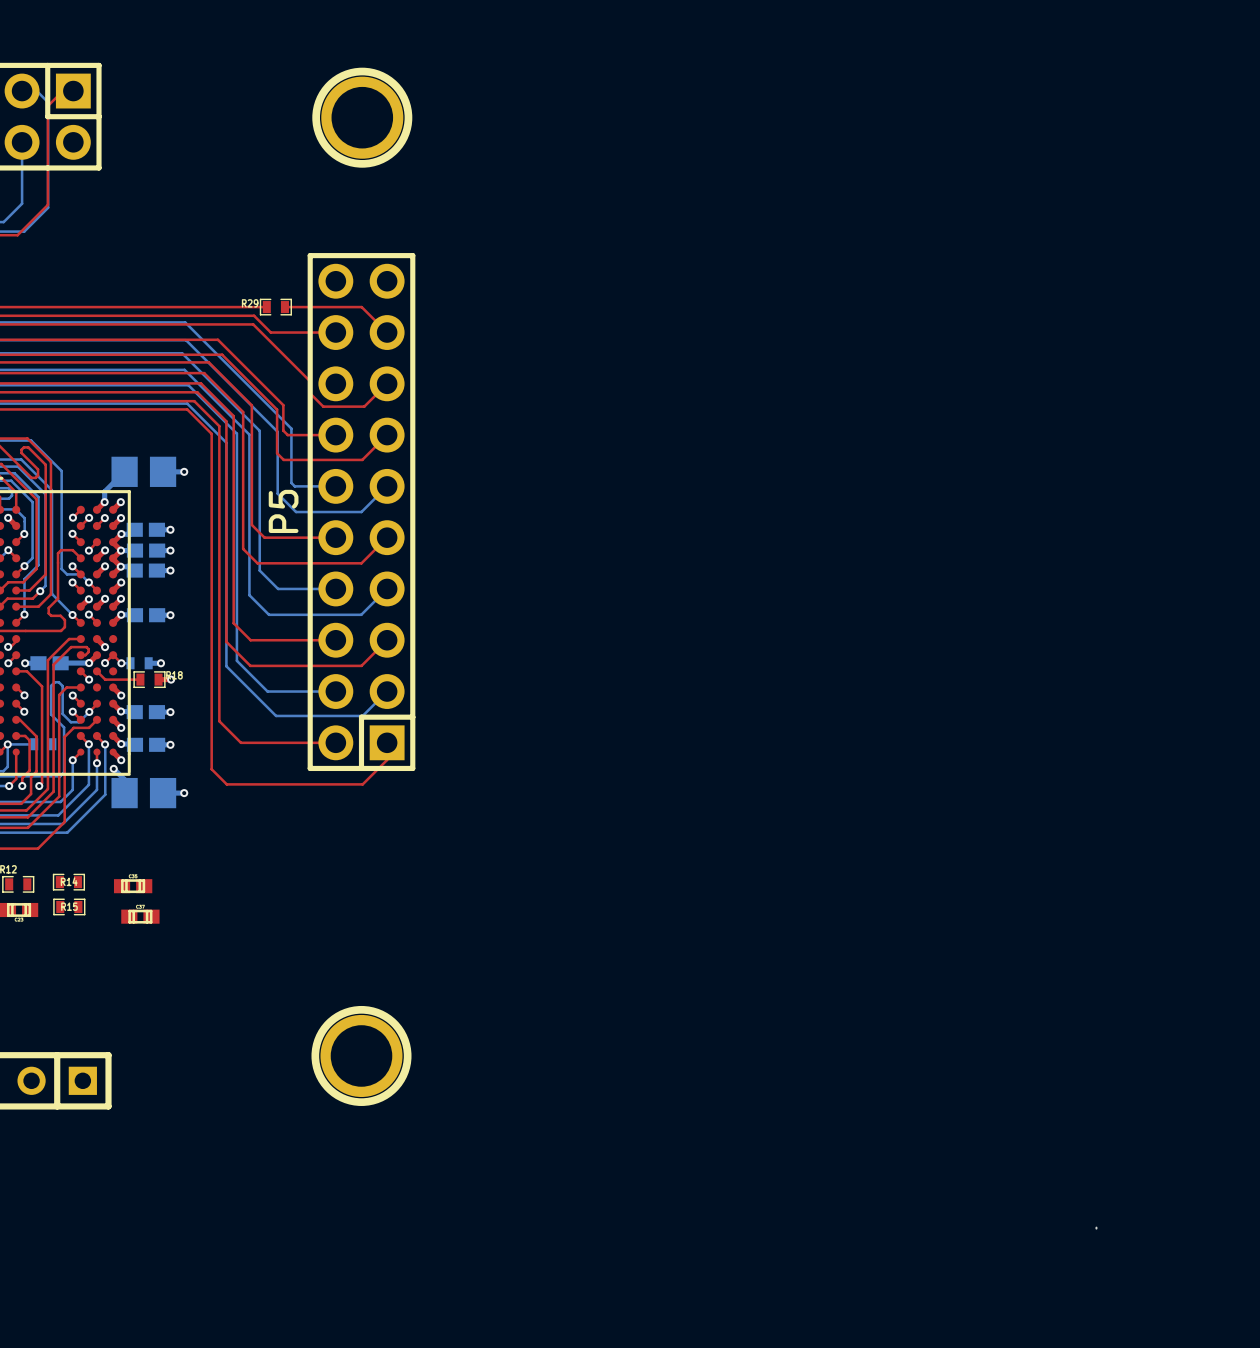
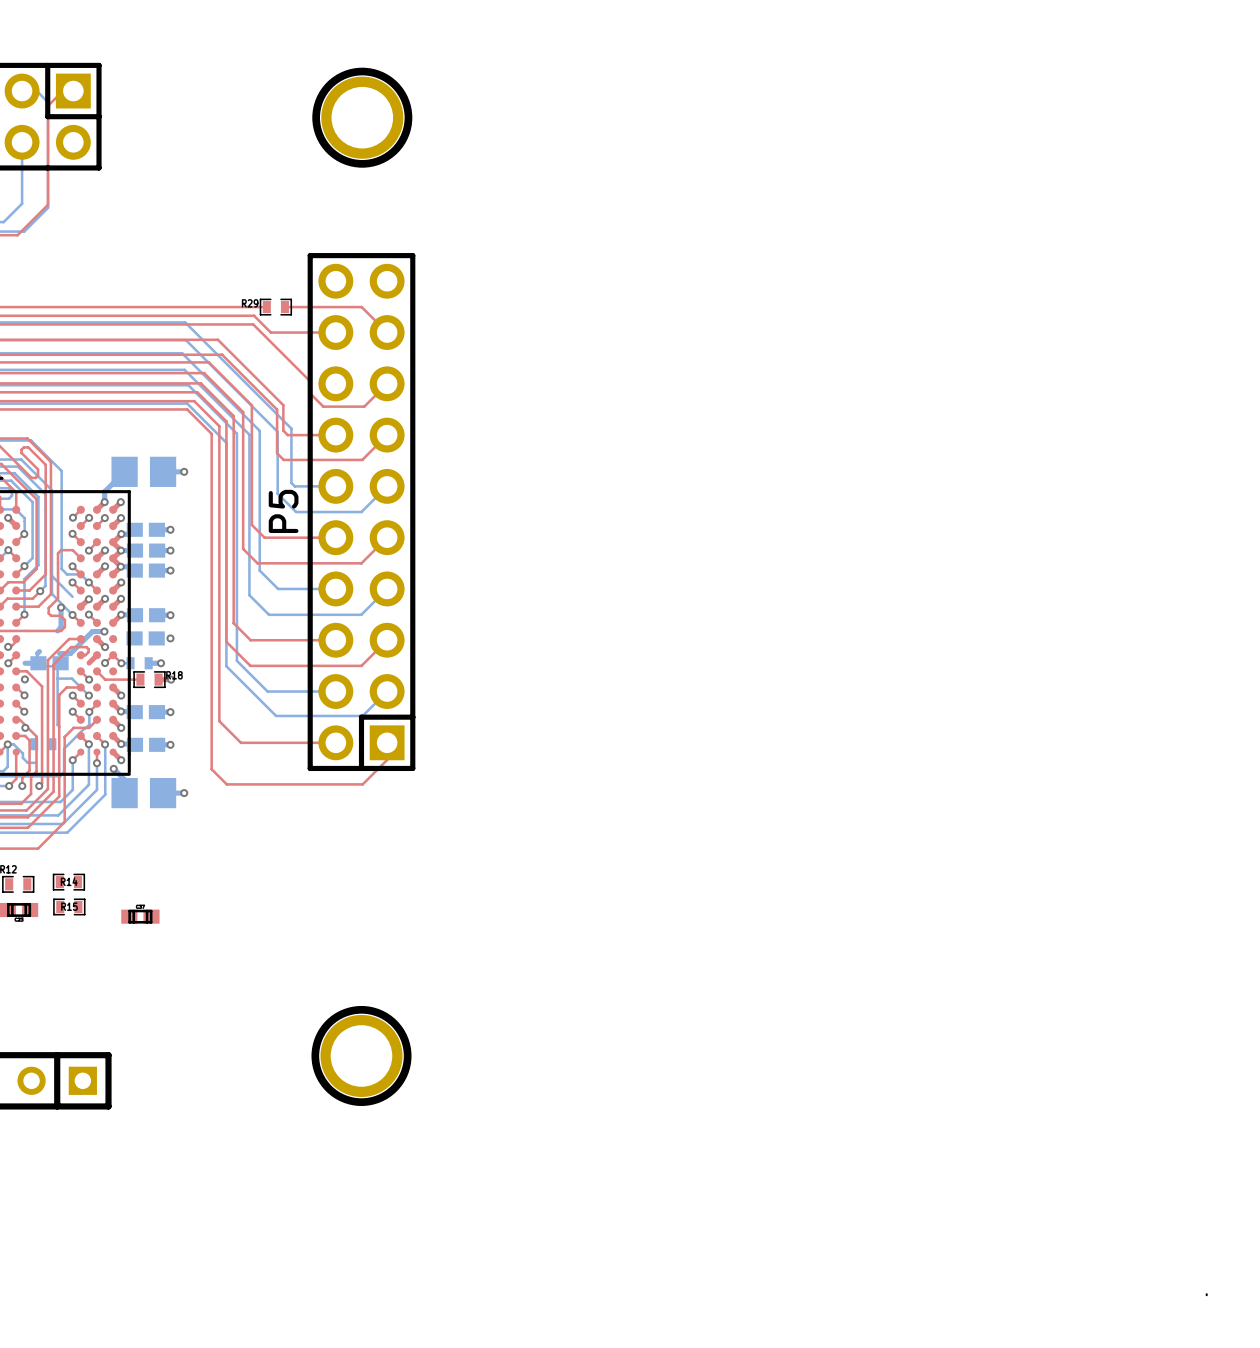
bottom track: none -> (51, 575) (72, 596)
bottom track: none -> (61, 607) (61, 627) (57, 630)
via: none -> (61, 607)
bottom track: none -> (104, 631) (92, 631) (70, 653) (59, 653)
via: none -> (104, 631)
part: none -> (145, 638)
via: none -> (170, 638)
bottom track: none -> (37, 653) (39, 651) (37, 653)
bottom track: none -> (37, 653) (37, 663) (39, 666) (57, 667) (57, 724) (59, 726)
via position: (25, 663) -> (24, 679)
bottom track: (60, 663) (89, 663) -> none
via: (89, 663) -> none
bottom track: none -> (57, 678) (71, 678) (88, 695)
via: none -> (88, 695)
bottom track: (89, 711) (79, 722) (70, 722) (62, 713) (62, 686) (58, 682) (54, 682) (51, 685) (51, 714) (64, 727) (64, 748) -> (89, 711) (89, 724) (64, 748)
via: none -> (25, 727)
bottom track: (13, 744) (34, 744) -> (13, 744) (22, 753) (22, 757) (27, 762) (35, 762)
part: (133, 886) -> none
board edge: (1096, 1227) (1096, 1228) -> (1206, 1294) (1206, 1295)

